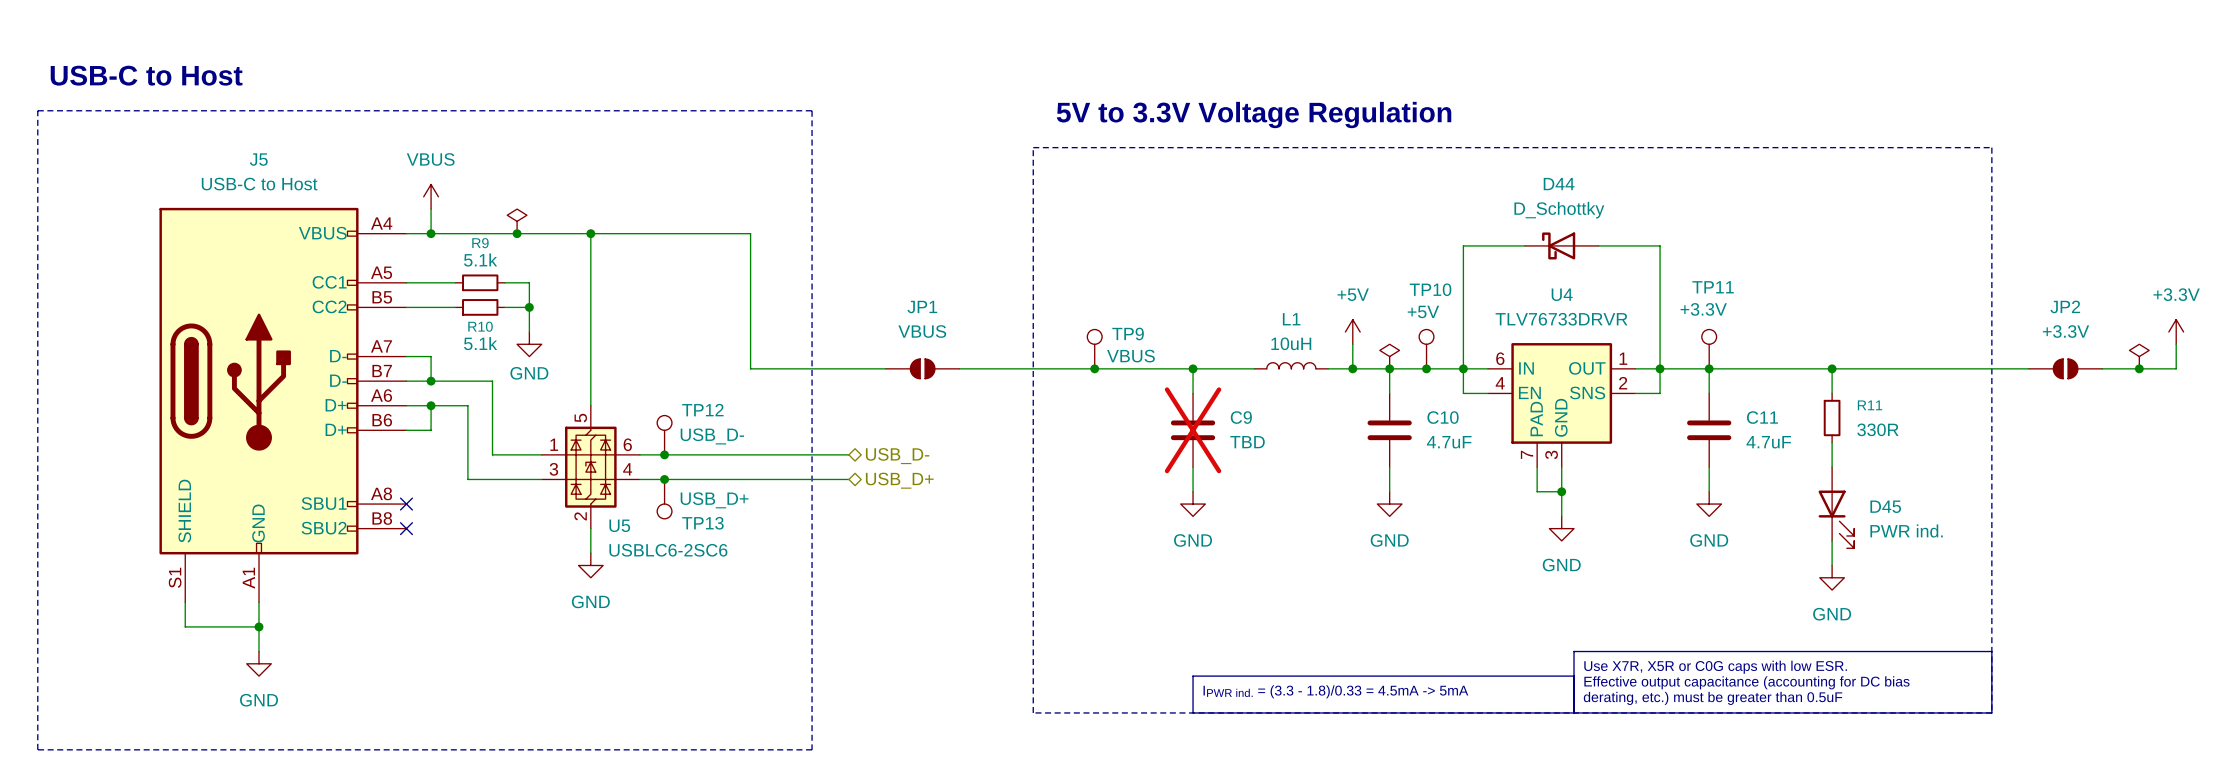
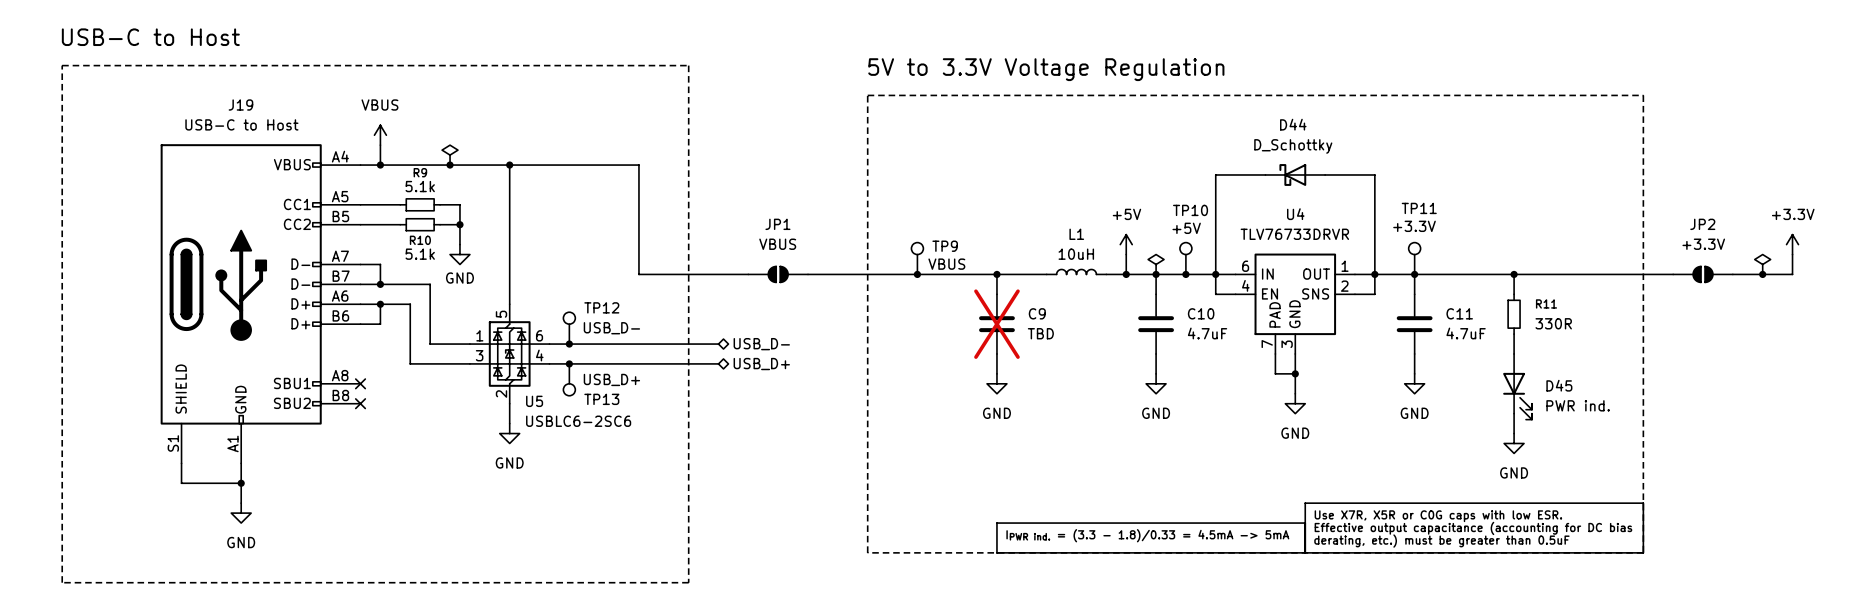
J5 name: J5 (258, 159) -> J19 (240, 105)

